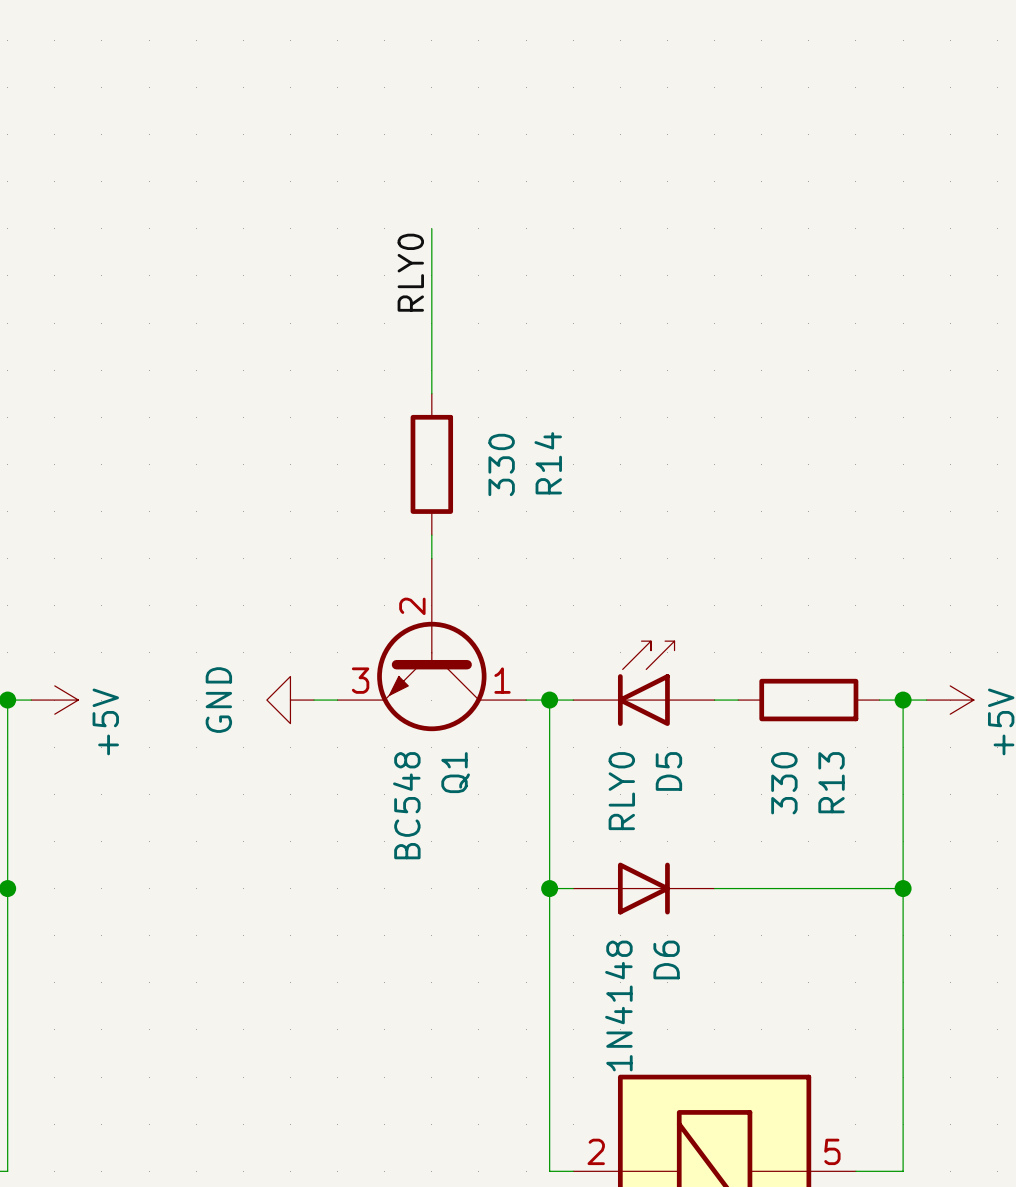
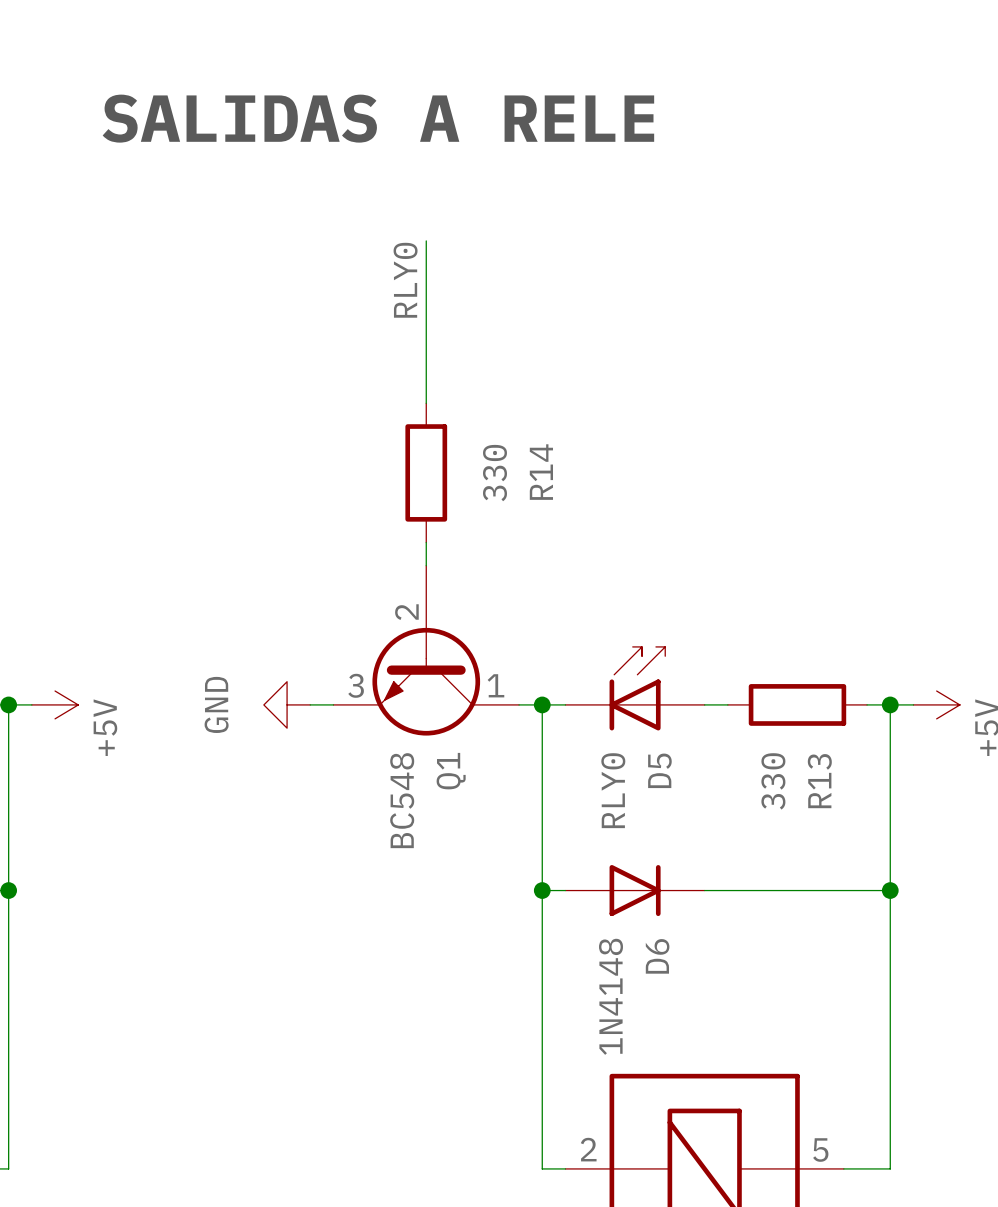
text: none -> SALIDAS A RELE (378, 118)

